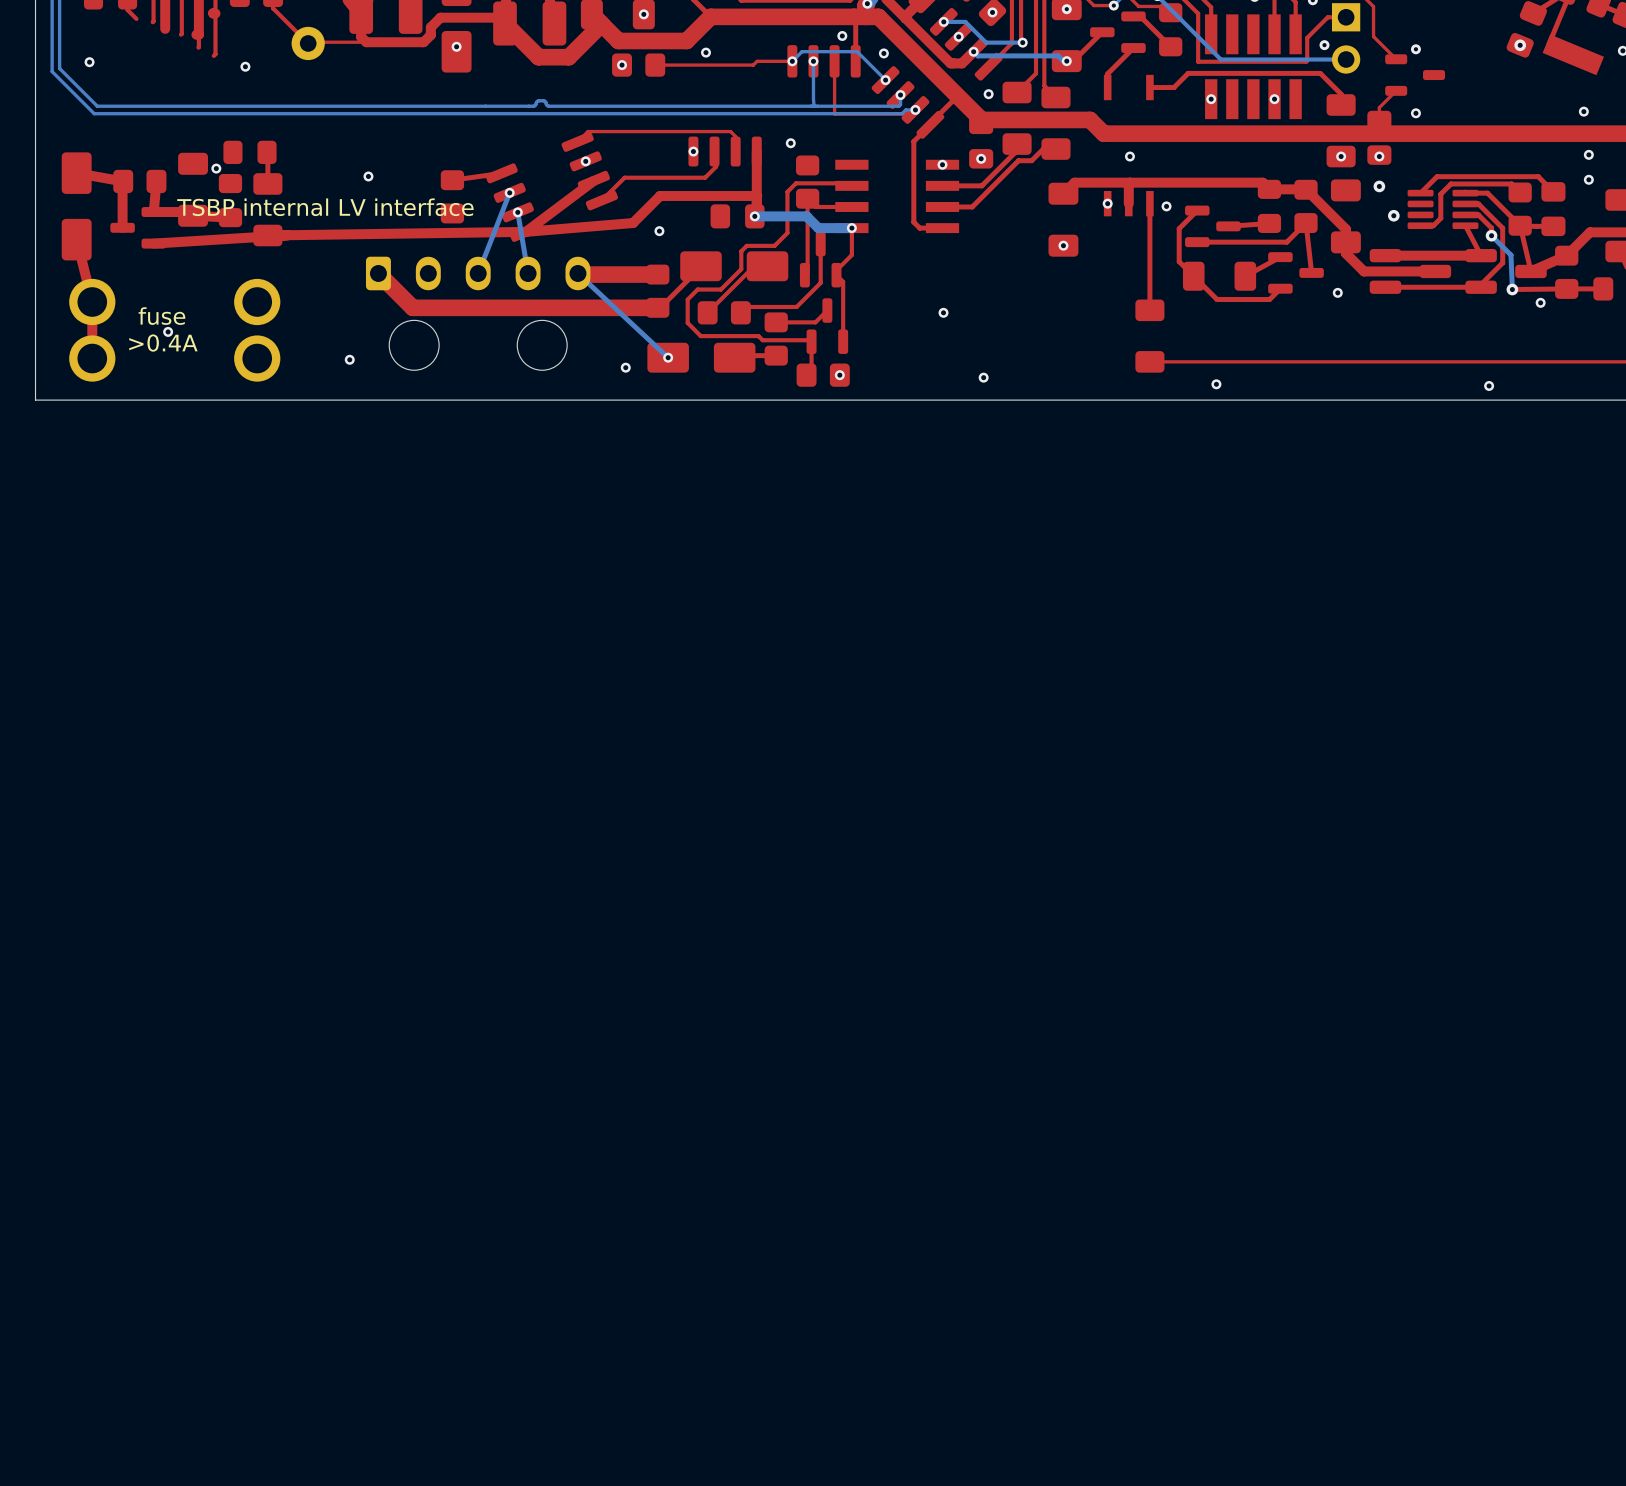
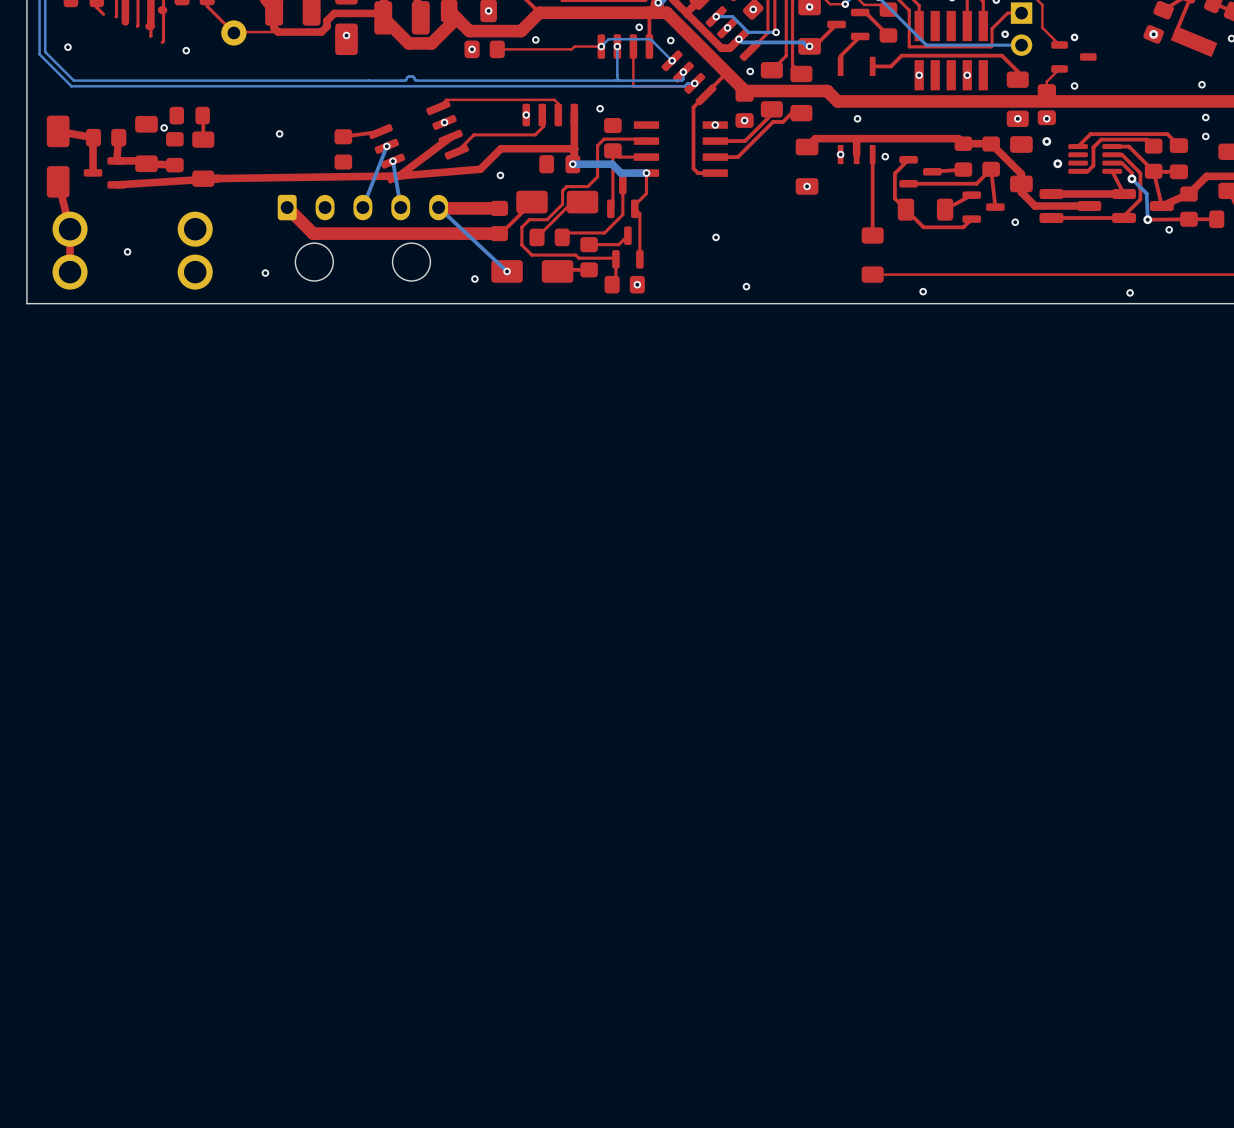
text: TSBP internal LV interface (325, 207) -> none
text: fuse (161, 316) -> none
text: >0.4A (163, 343) -> none

